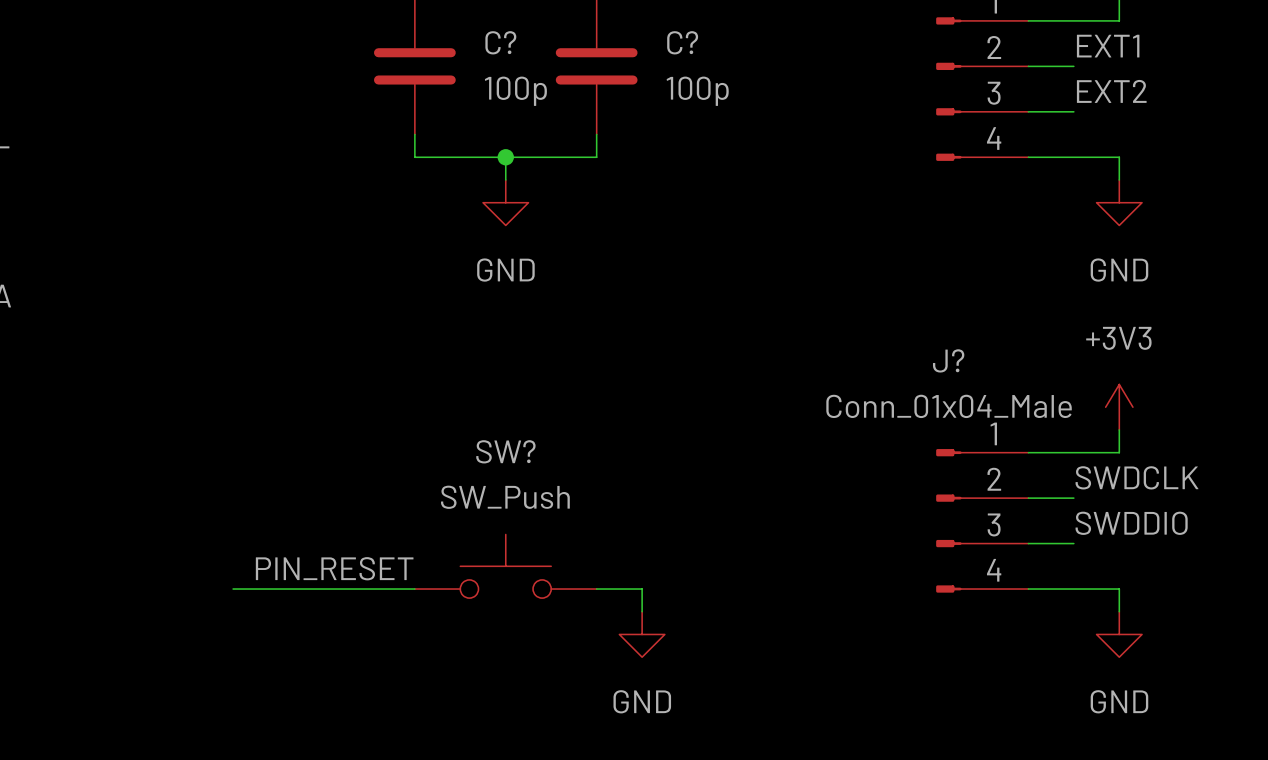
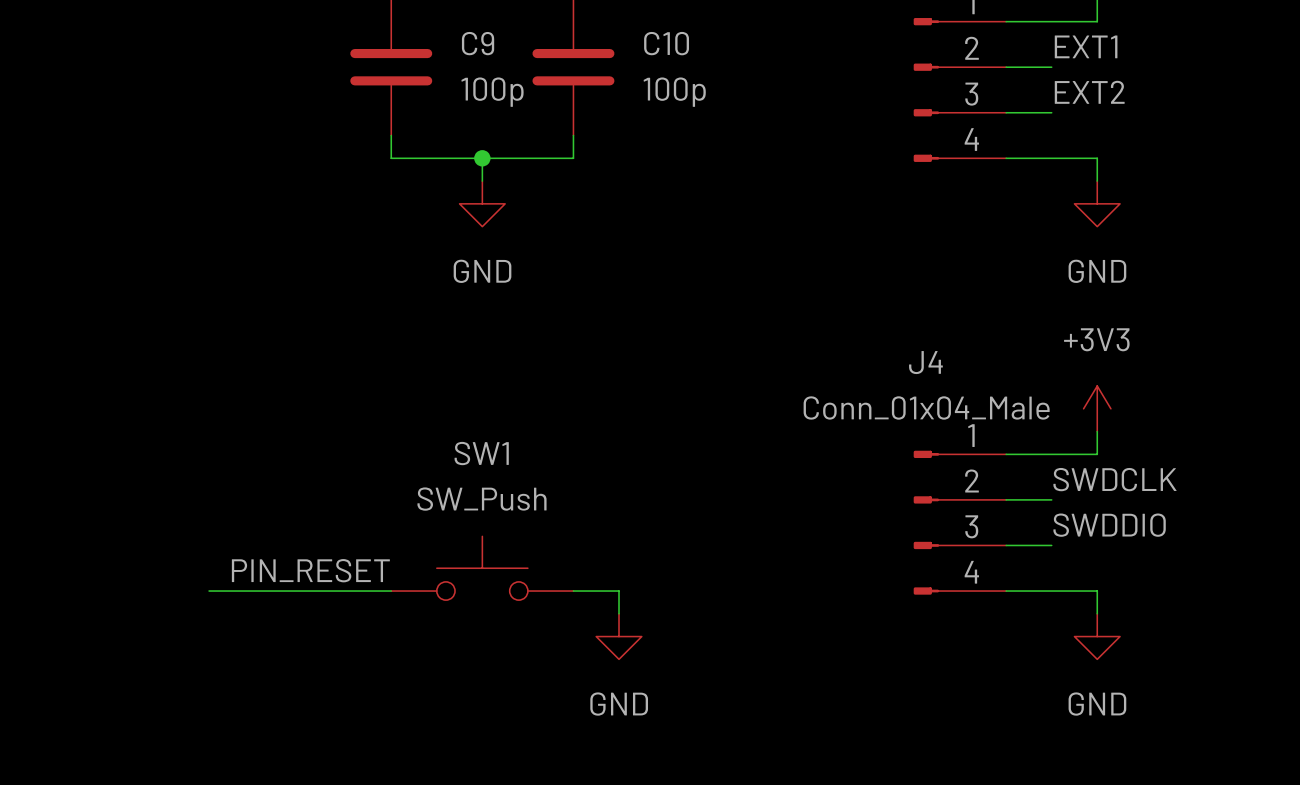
C? name: C? (500, 42) -> C9 (478, 43)
C? name: C? (682, 42) -> C10 (666, 43)
J? name: J? (948, 360) -> J4 (925, 362)
SW? name: SW? (505, 451) -> SW1 (481, 453)

